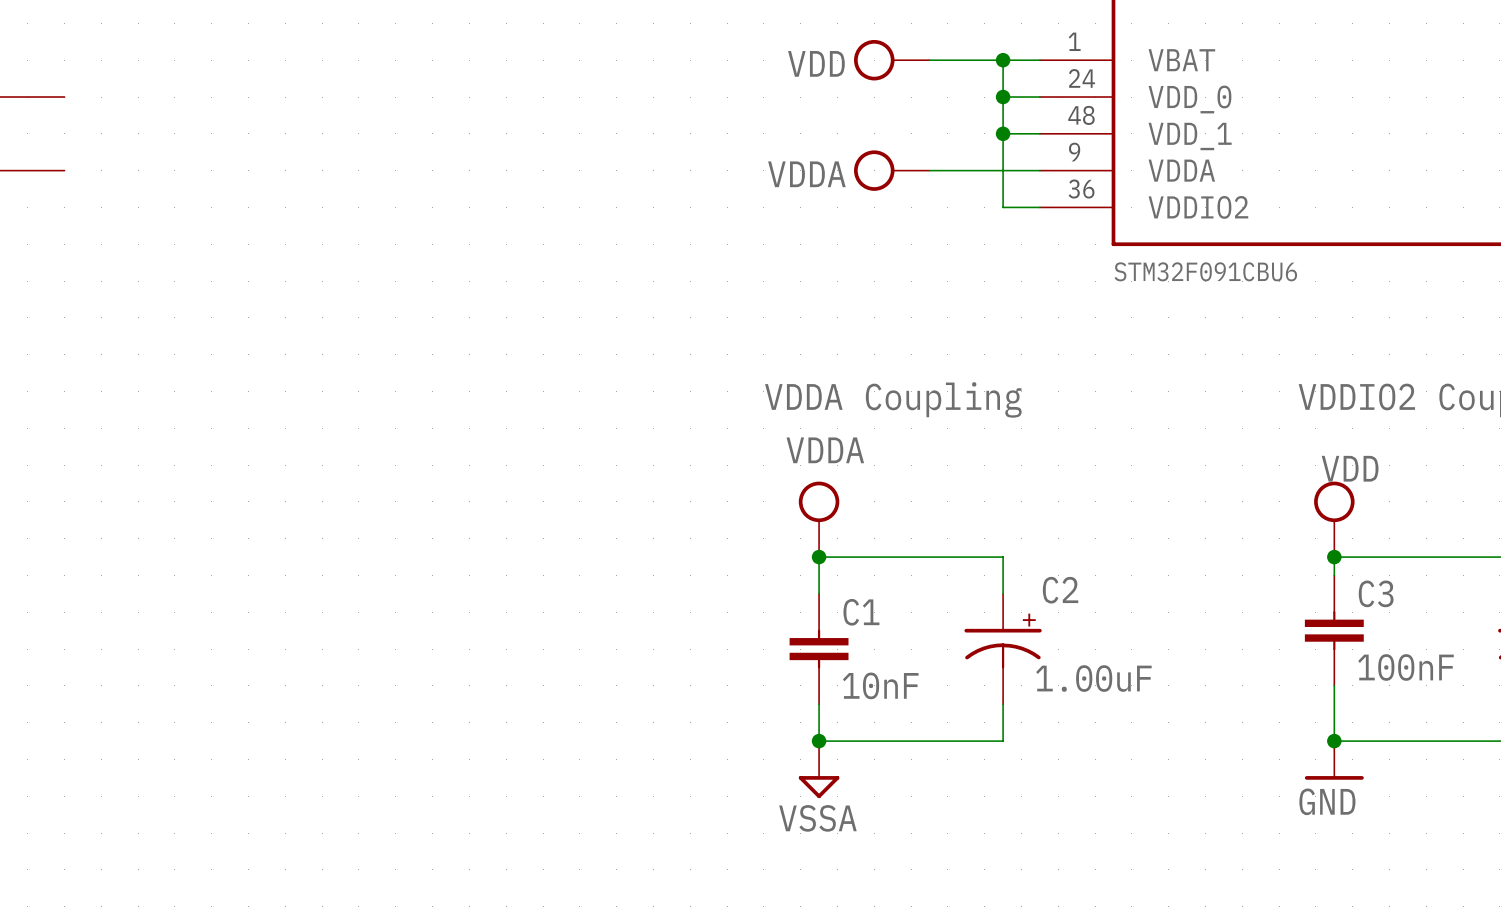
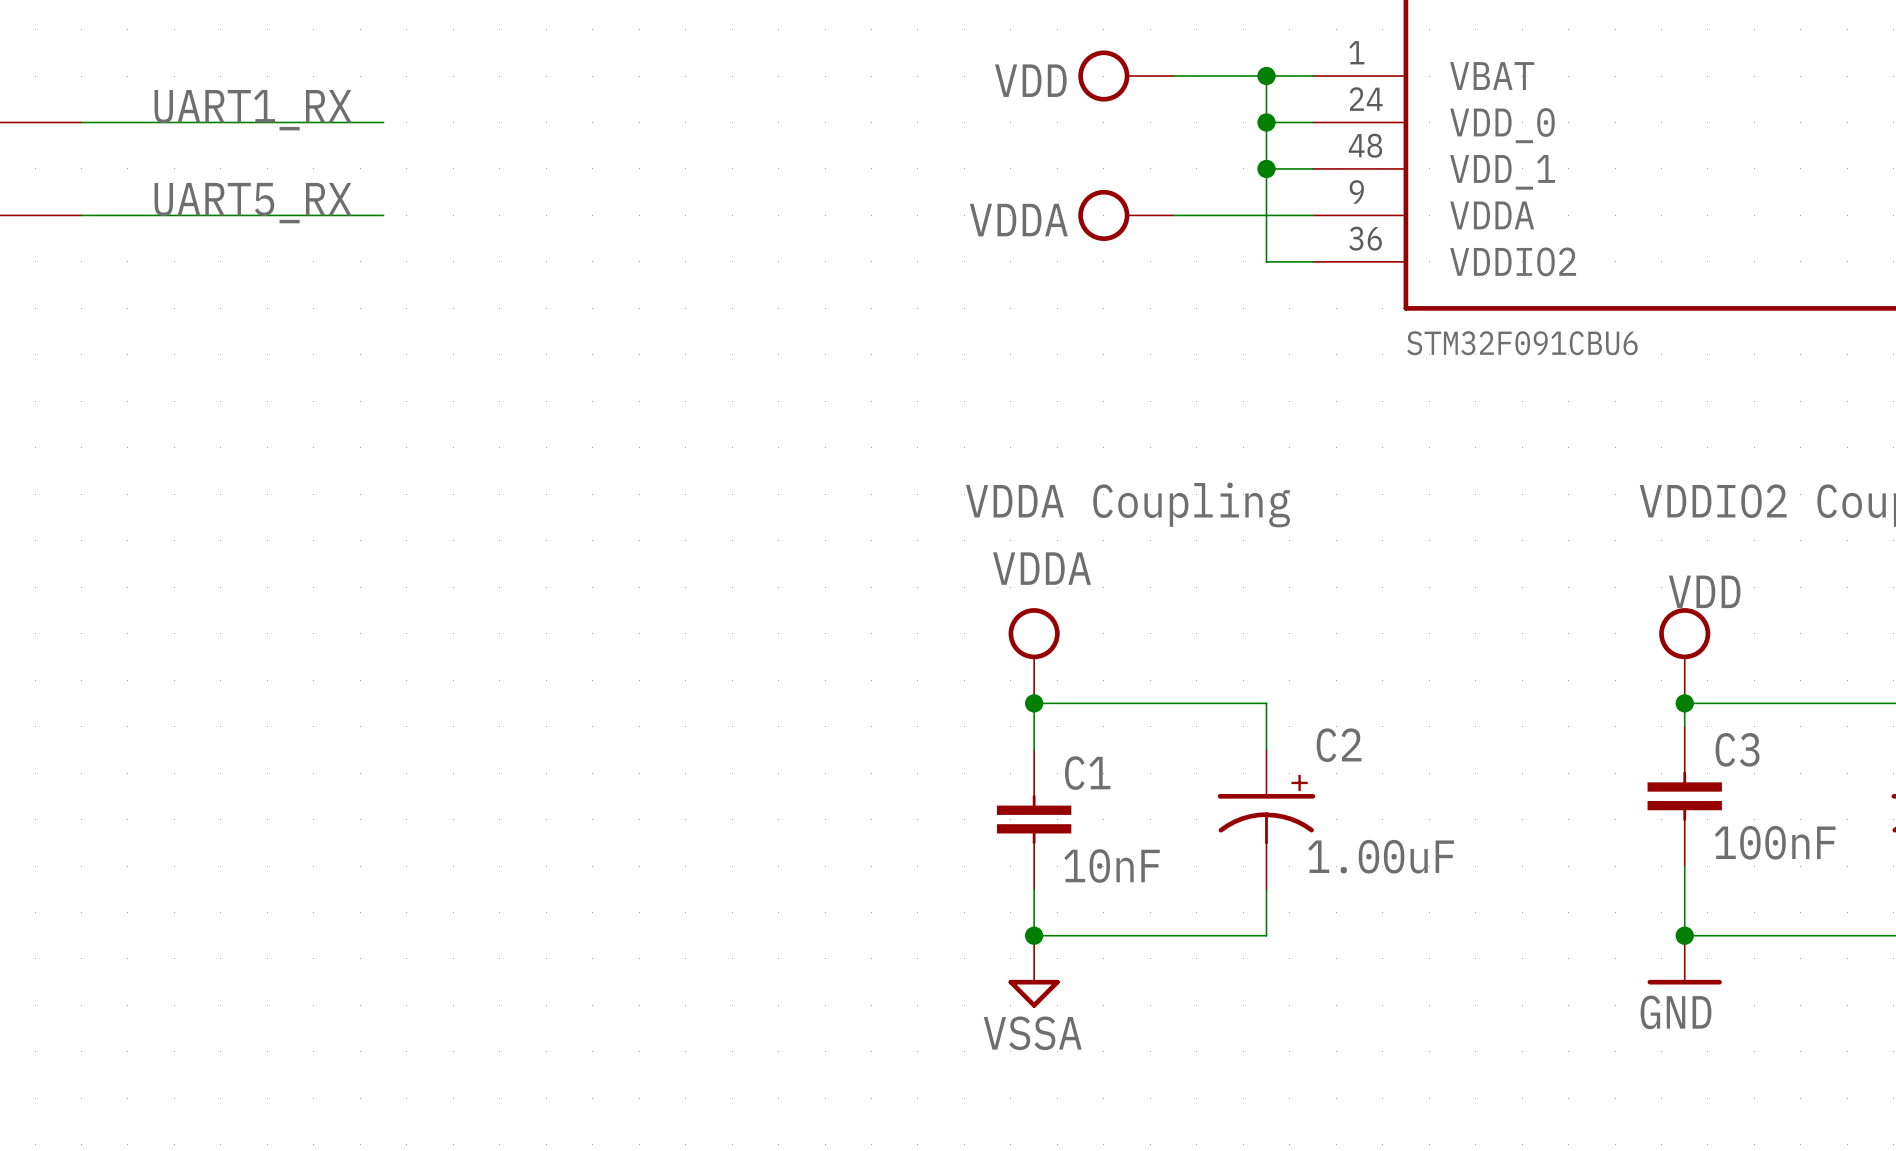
label: none -> UART1_RX (253, 110)
wire: none -> (81, 122) (383, 122)
label: none -> UART5_RX (253, 203)
wire: none -> (81, 215) (383, 215)

